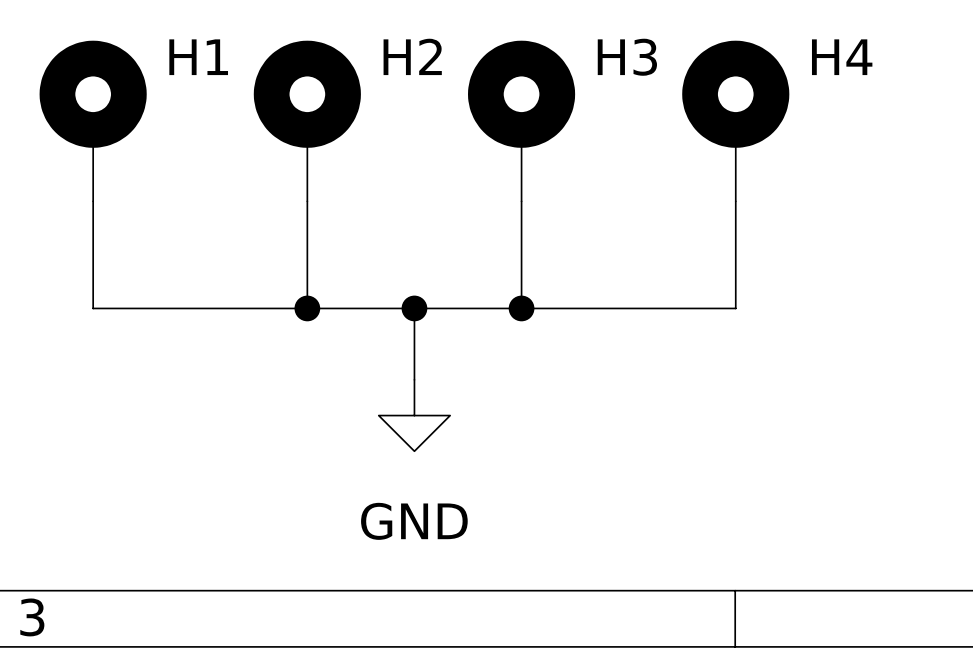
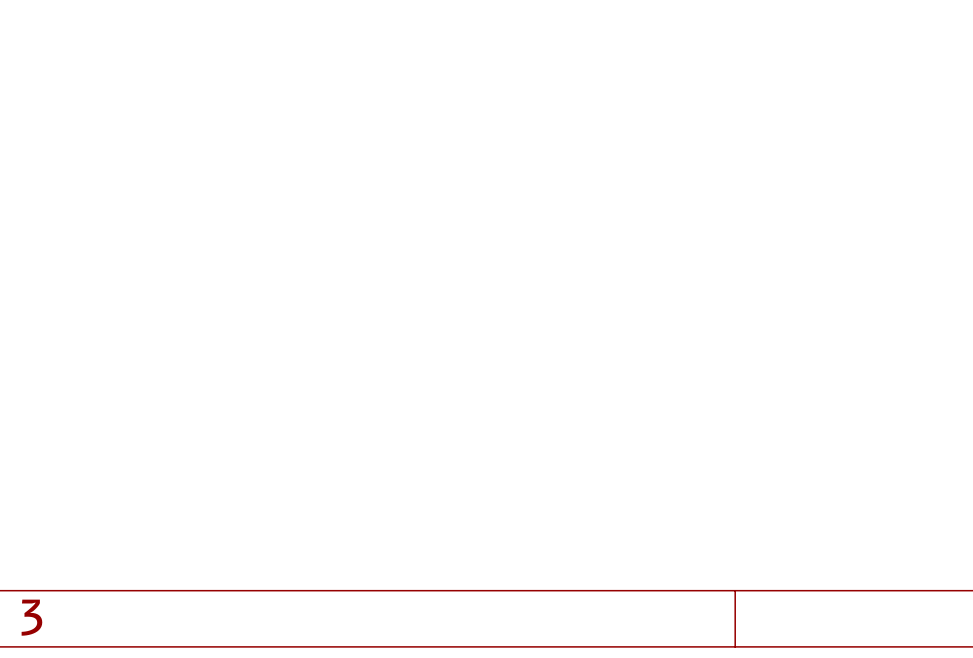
H1: (93, 121) -> none
H2: (307, 121) -> none
H3: (521, 121) -> none
H4: (735, 121) -> none
wire: (93, 201) (93, 308) (735, 308) (735, 201) -> none
wire: (307, 201) (307, 308) -> none
wire: (521, 201) (521, 308) -> none
junction: (307, 308) -> none
wire: (414, 308) (414, 379) -> none
junction: (414, 308) -> none
junction: (521, 308) -> none
power symbol: GND (414, 415) -> none

